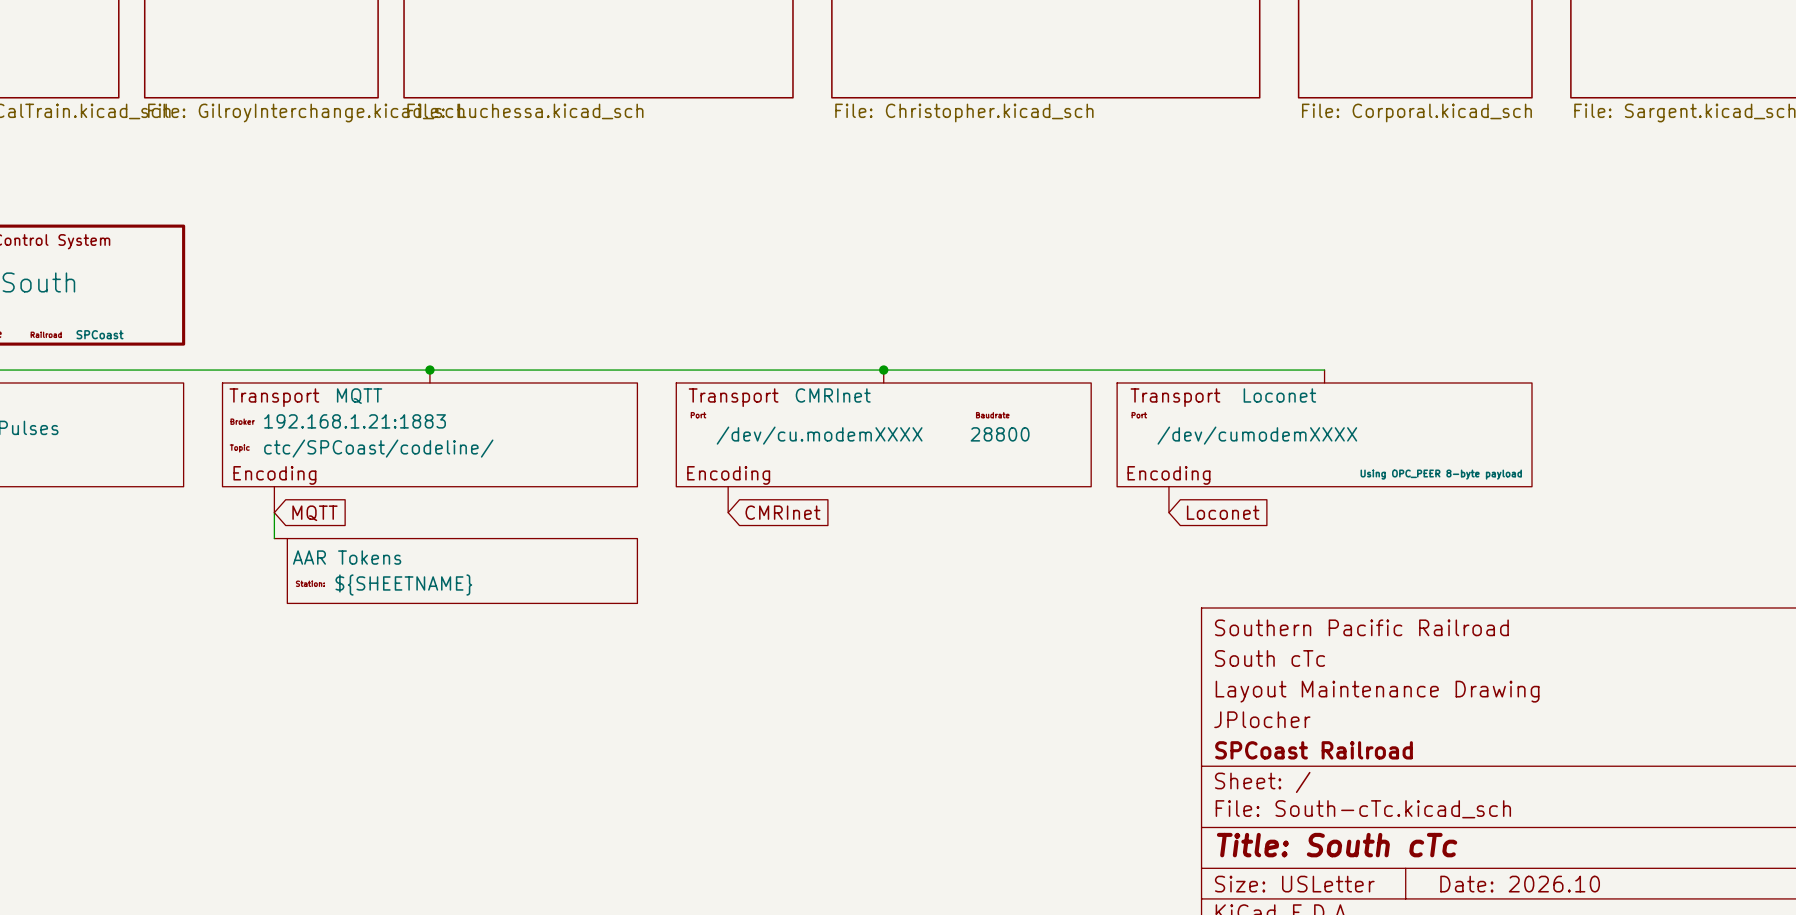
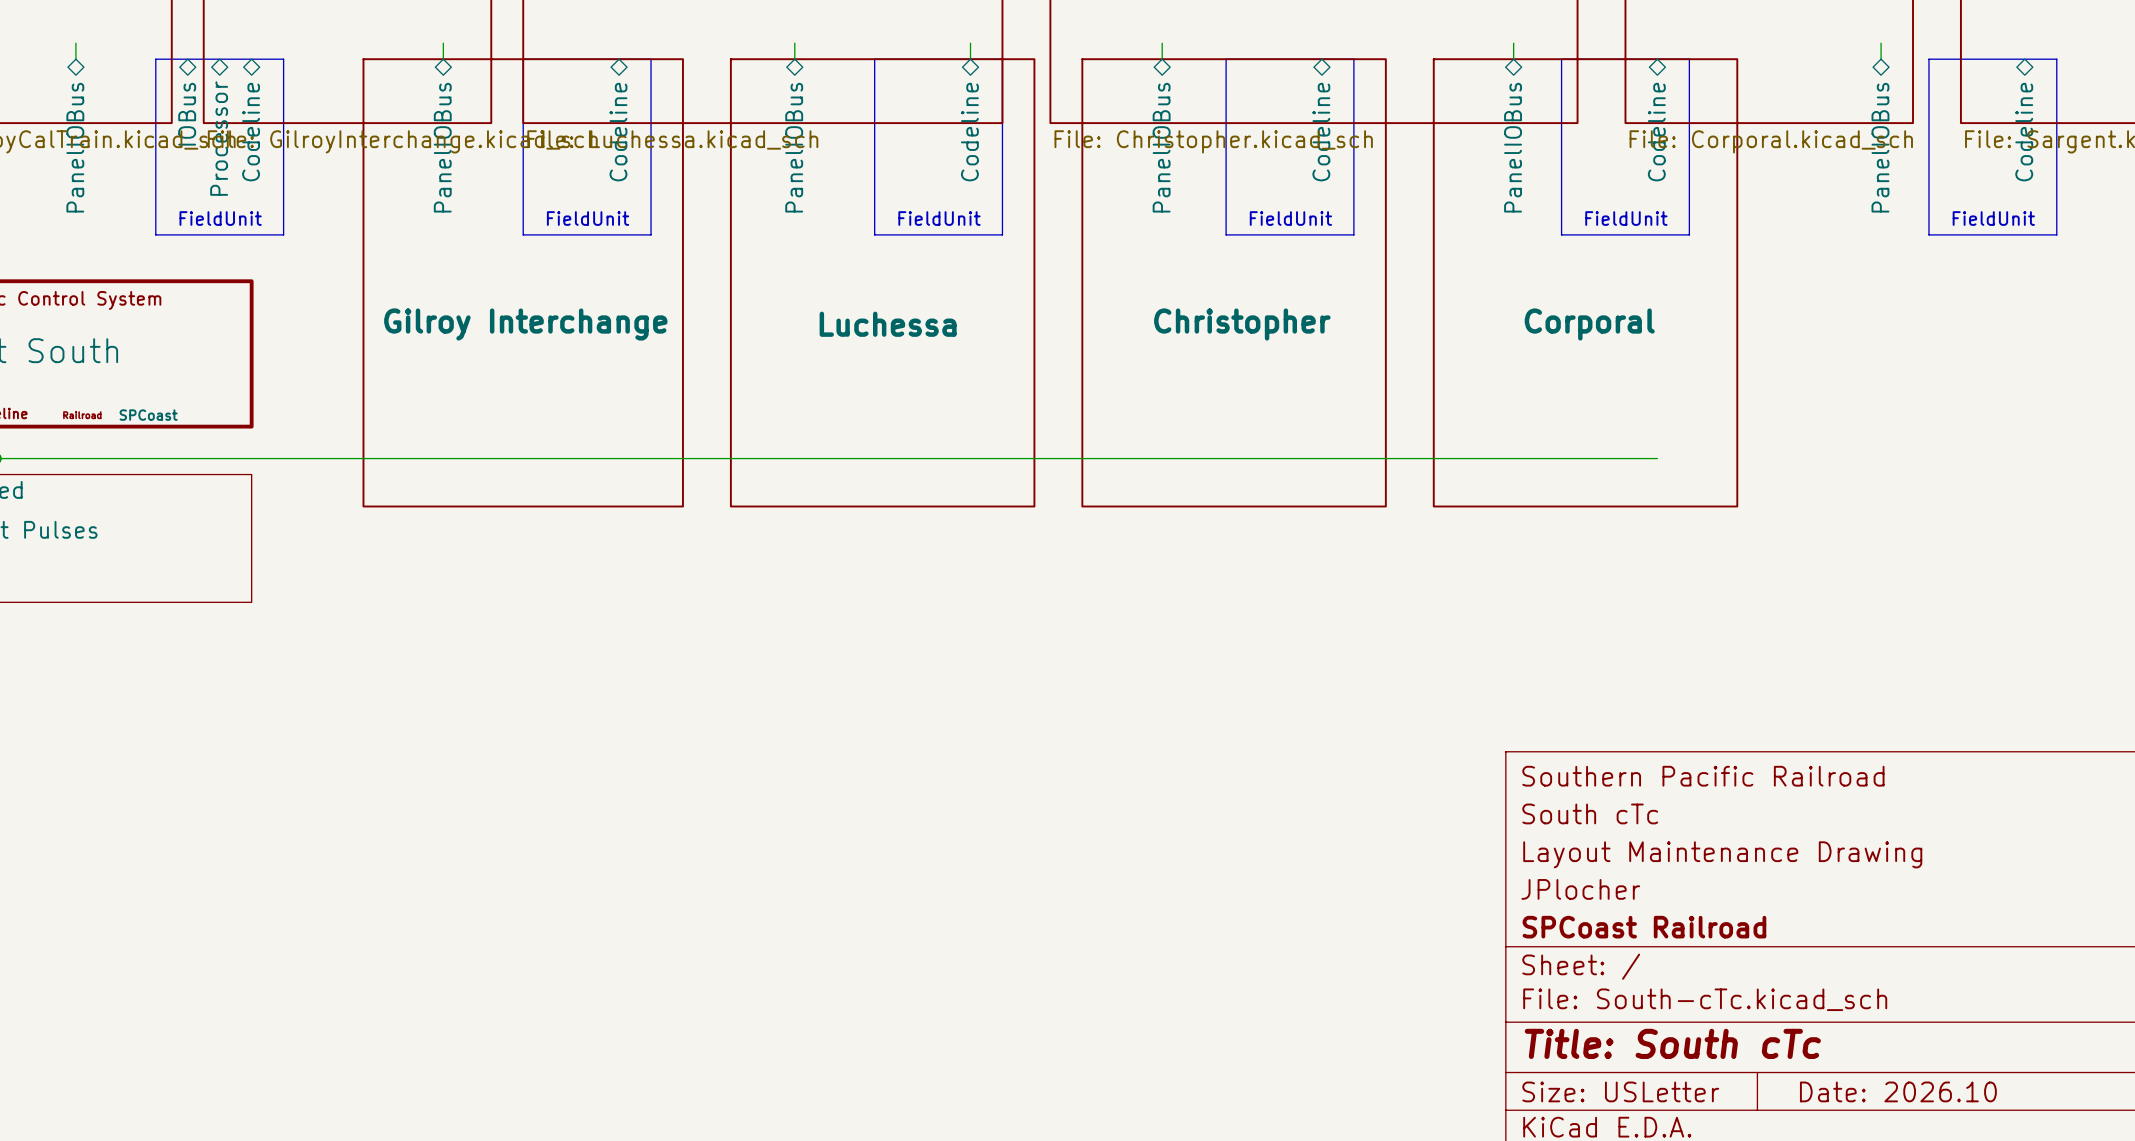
wire: none -> (75, 43) (75, 59)
wire: none -> (443, 43) (443, 59)
wire: none -> (794, 43) (794, 59)
wire: none -> (970, 43) (970, 59)
wire: none -> (1162, 43) (1162, 59)
wire: none -> (1513, 43) (1513, 59)
wire: none -> (1881, 43) (1881, 59)
line: none -> (155, 59) (283, 59) (283, 234) (155, 234) (155, 59)
line: none -> (523, 59) (651, 59) (651, 234) (523, 234) (523, 59)
line: none -> (874, 59) (1002, 59) (1002, 234) (874, 234) (874, 59)
line: none -> (1226, 59) (1353, 59) (1353, 234) (1226, 234) (1226, 59)
line: none -> (1561, 59) (1689, 59) (1689, 234) (1561, 234) (1561, 59)
line: none -> (1928, 59) (2056, 59) (2056, 234) (1928, 234) (1928, 59)
sheet pin: none -> IOBus (187, 114)
sheet pin: none -> Codeline (251, 132)
sheet pin: none -> Codeline (618, 132)
sheet pin: none -> Codeline (969, 132)
sheet pin: none -> Codeline (1321, 132)
sheet pin: none -> Codeline (1656, 132)
sheet pin: none -> Codeline (2024, 132)
sheet pin: none -> Processor (219, 138)
sheet pin: none -> PanelIOBus (75, 147)
sheet pin: none -> PanelIOBus (442, 147)
sheet pin: none -> PanelIOBus (794, 147)
sheet pin: none -> PanelIOBus (1161, 147)
sheet pin: none -> PanelIOBus (1513, 147)
sheet pin: none -> PanelIOBus (1880, 147)
text: none -> FieldUnit (220, 218)
text: none -> FieldUnit (588, 218)
text: none -> FieldUnit (939, 218)
text: none -> FieldUnit (1290, 218)
text: none -> FieldUnit (1626, 218)
text: none -> FieldUnit (1993, 218)
sheet Gilroy Interchange: none -> (523, 282)
sheet Luchessa: none -> (882, 282)
sheet Christopher: none -> (1234, 282)
sheet Corporal: none -> (1585, 282)
junction: (429, 370) -> none
junction: (883, 370) -> none
part: MQTT (429, 441) -> none
part: CMRInet (883, 441) -> none
part: Loconet (1324, 441) -> none
wire: (274, 512) (274, 538) -> none
global label: CMRInet (782, 512) -> none
global label: Loconet (1223, 512) -> none
global label: MQTT (314, 513) -> none
part: AAR Tokens (455, 570) -> none

